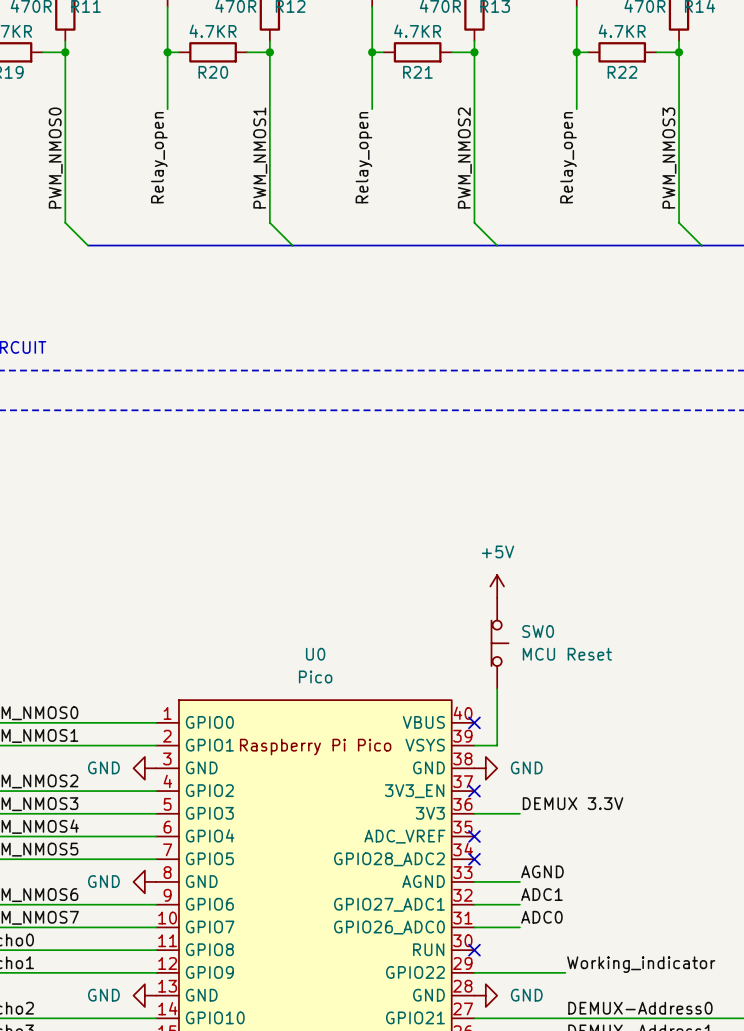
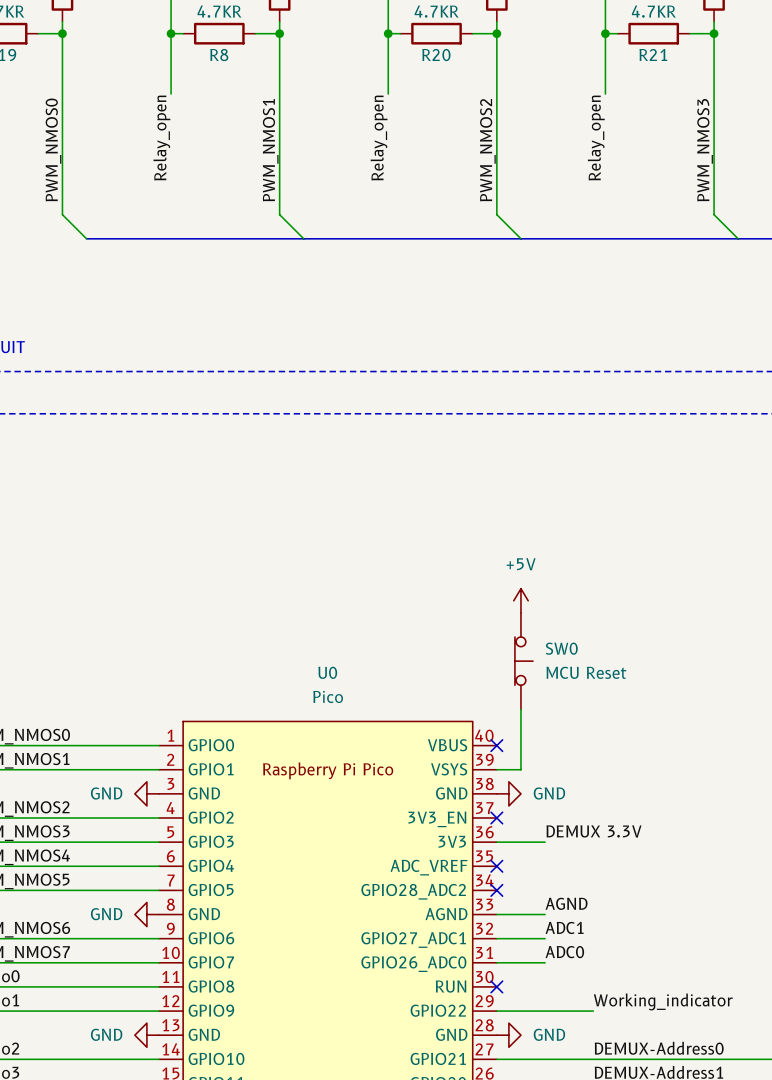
R20 name: R20 (213, 72) -> R8 (219, 55)
R21 name: R21 (417, 72) -> R20 (436, 55)
R22 name: R22 (622, 72) -> R21 (653, 54)

